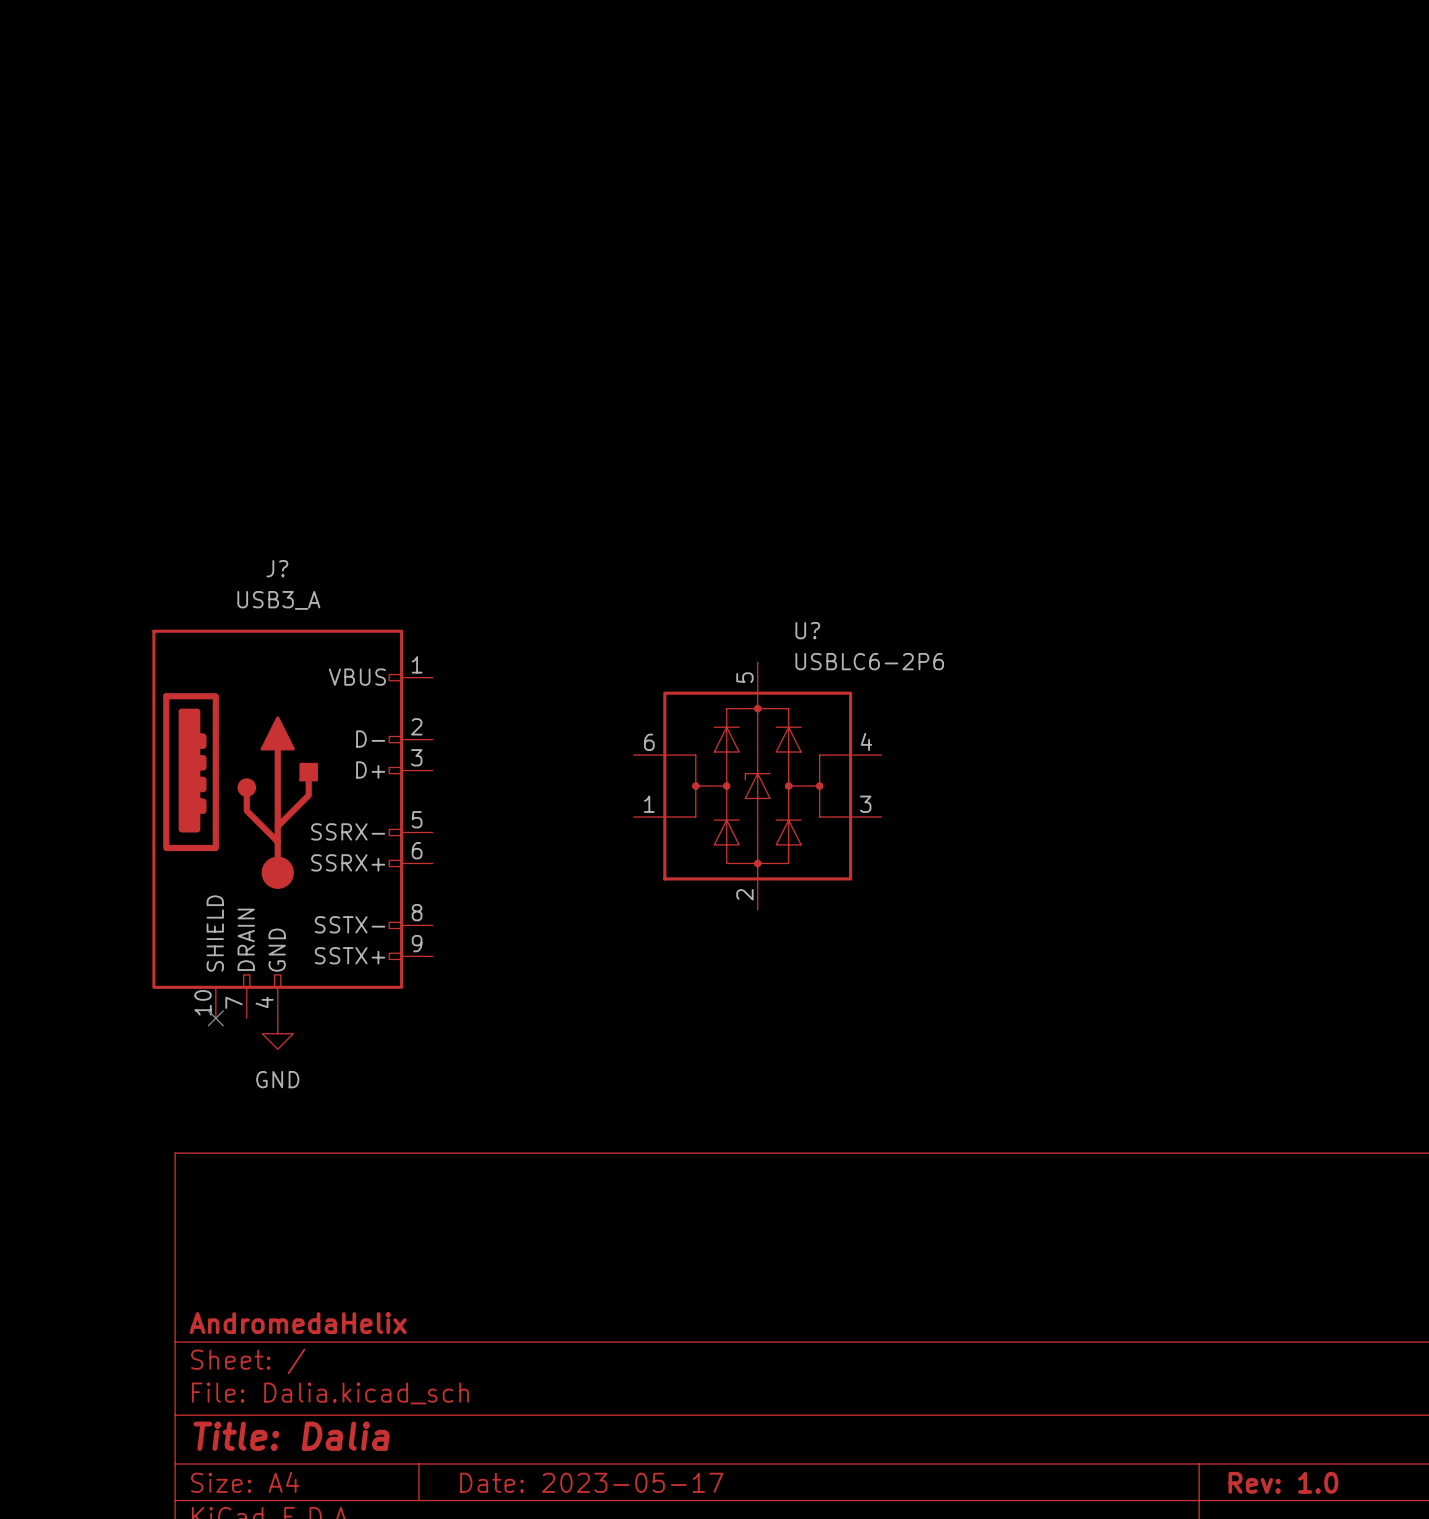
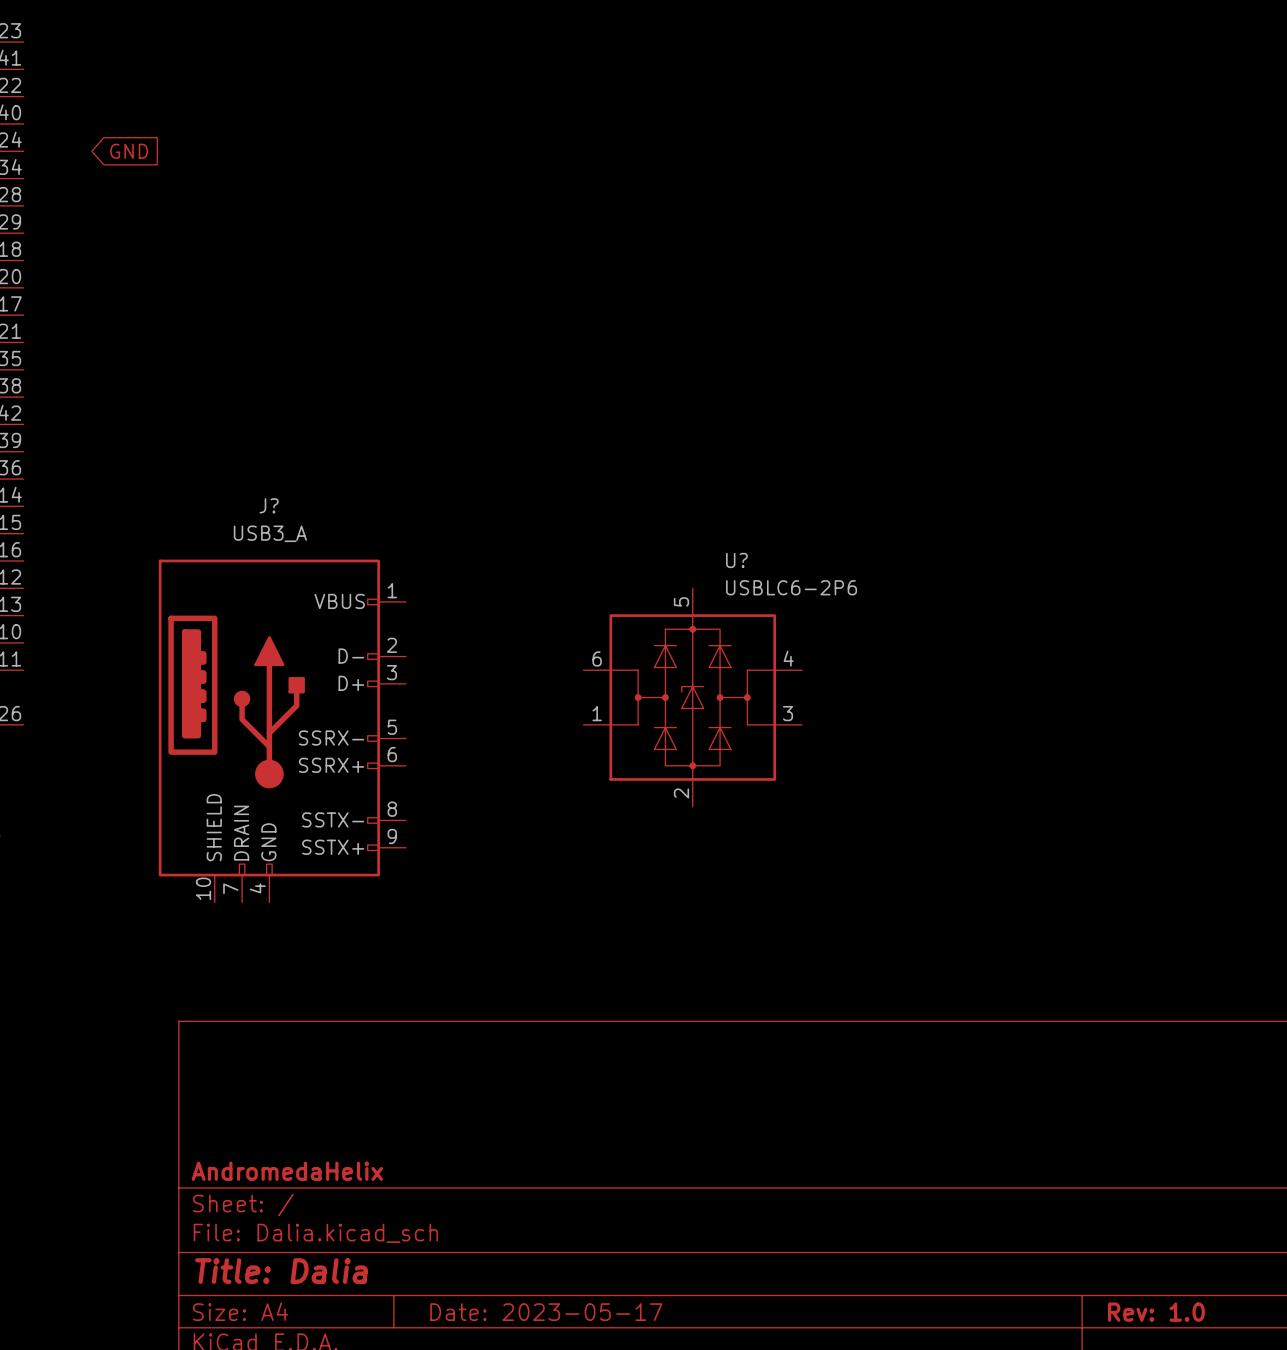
global label: none -> GND (129, 151)
no-connect mark: (215, 1018) -> none
power symbol: GND (277, 1033) -> none

